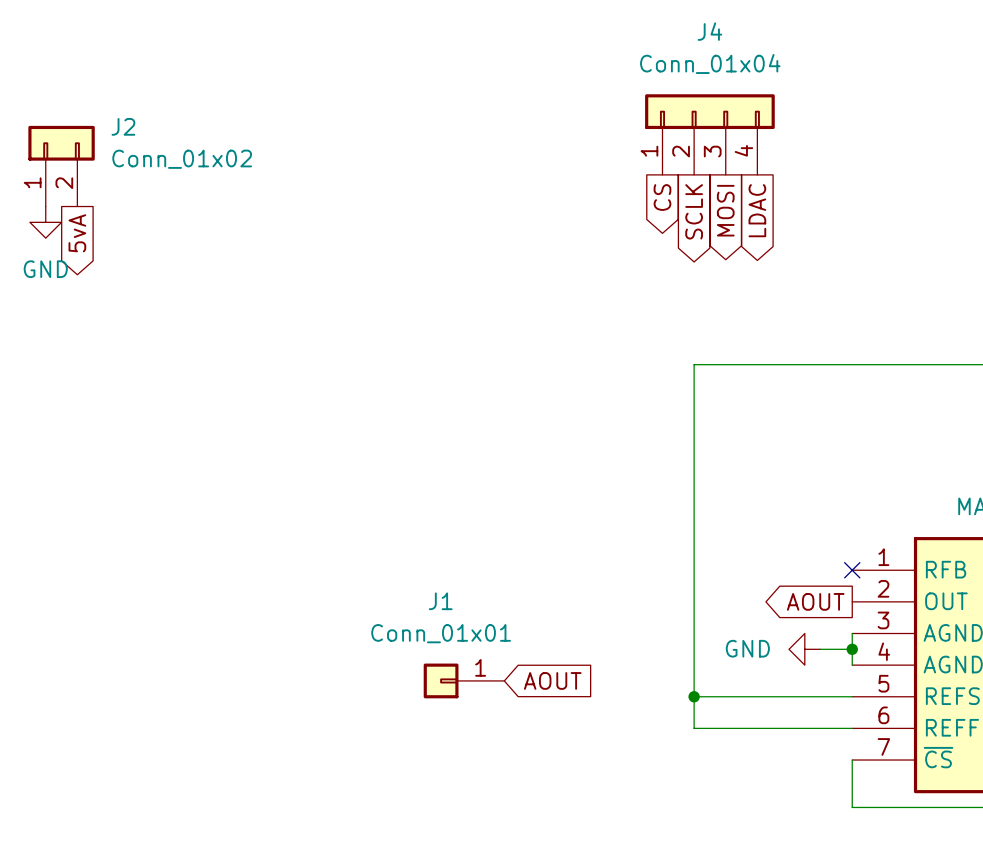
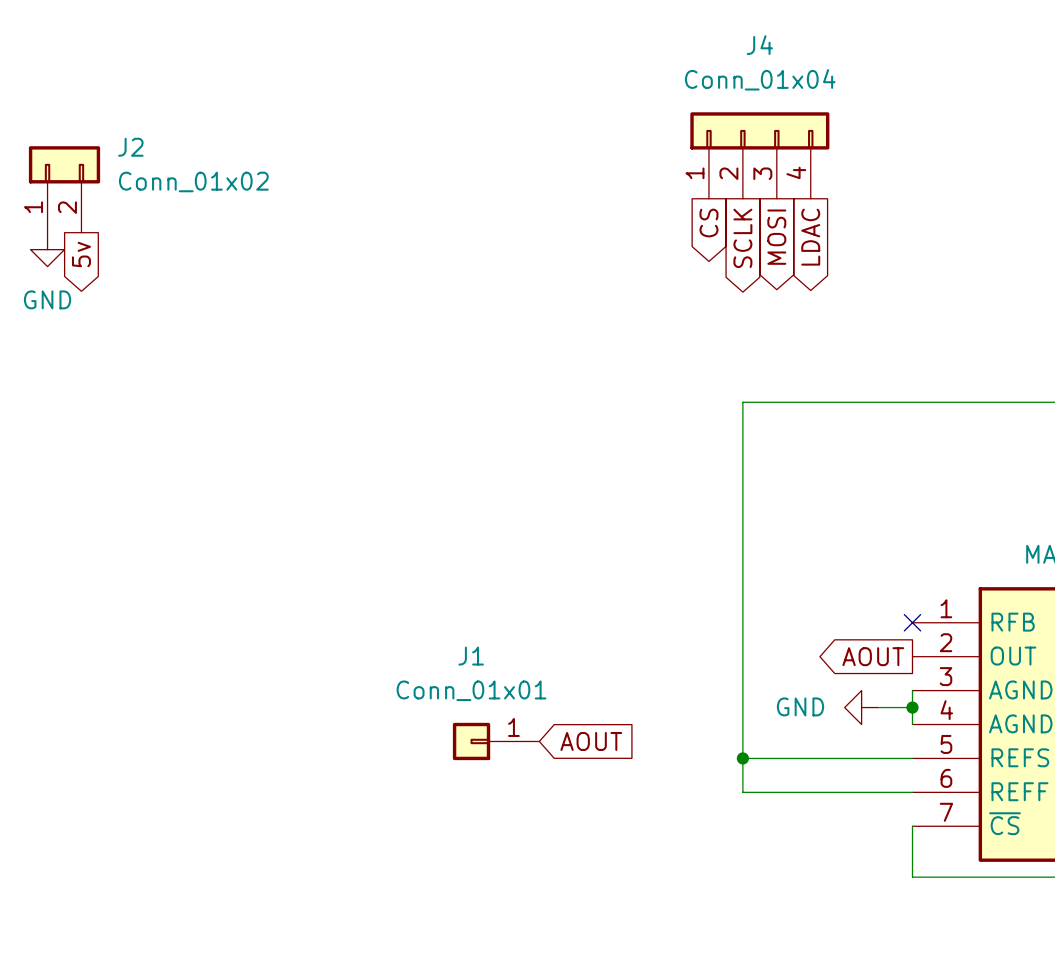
global label: 5vA (77, 233) -> 5v (81, 254)

